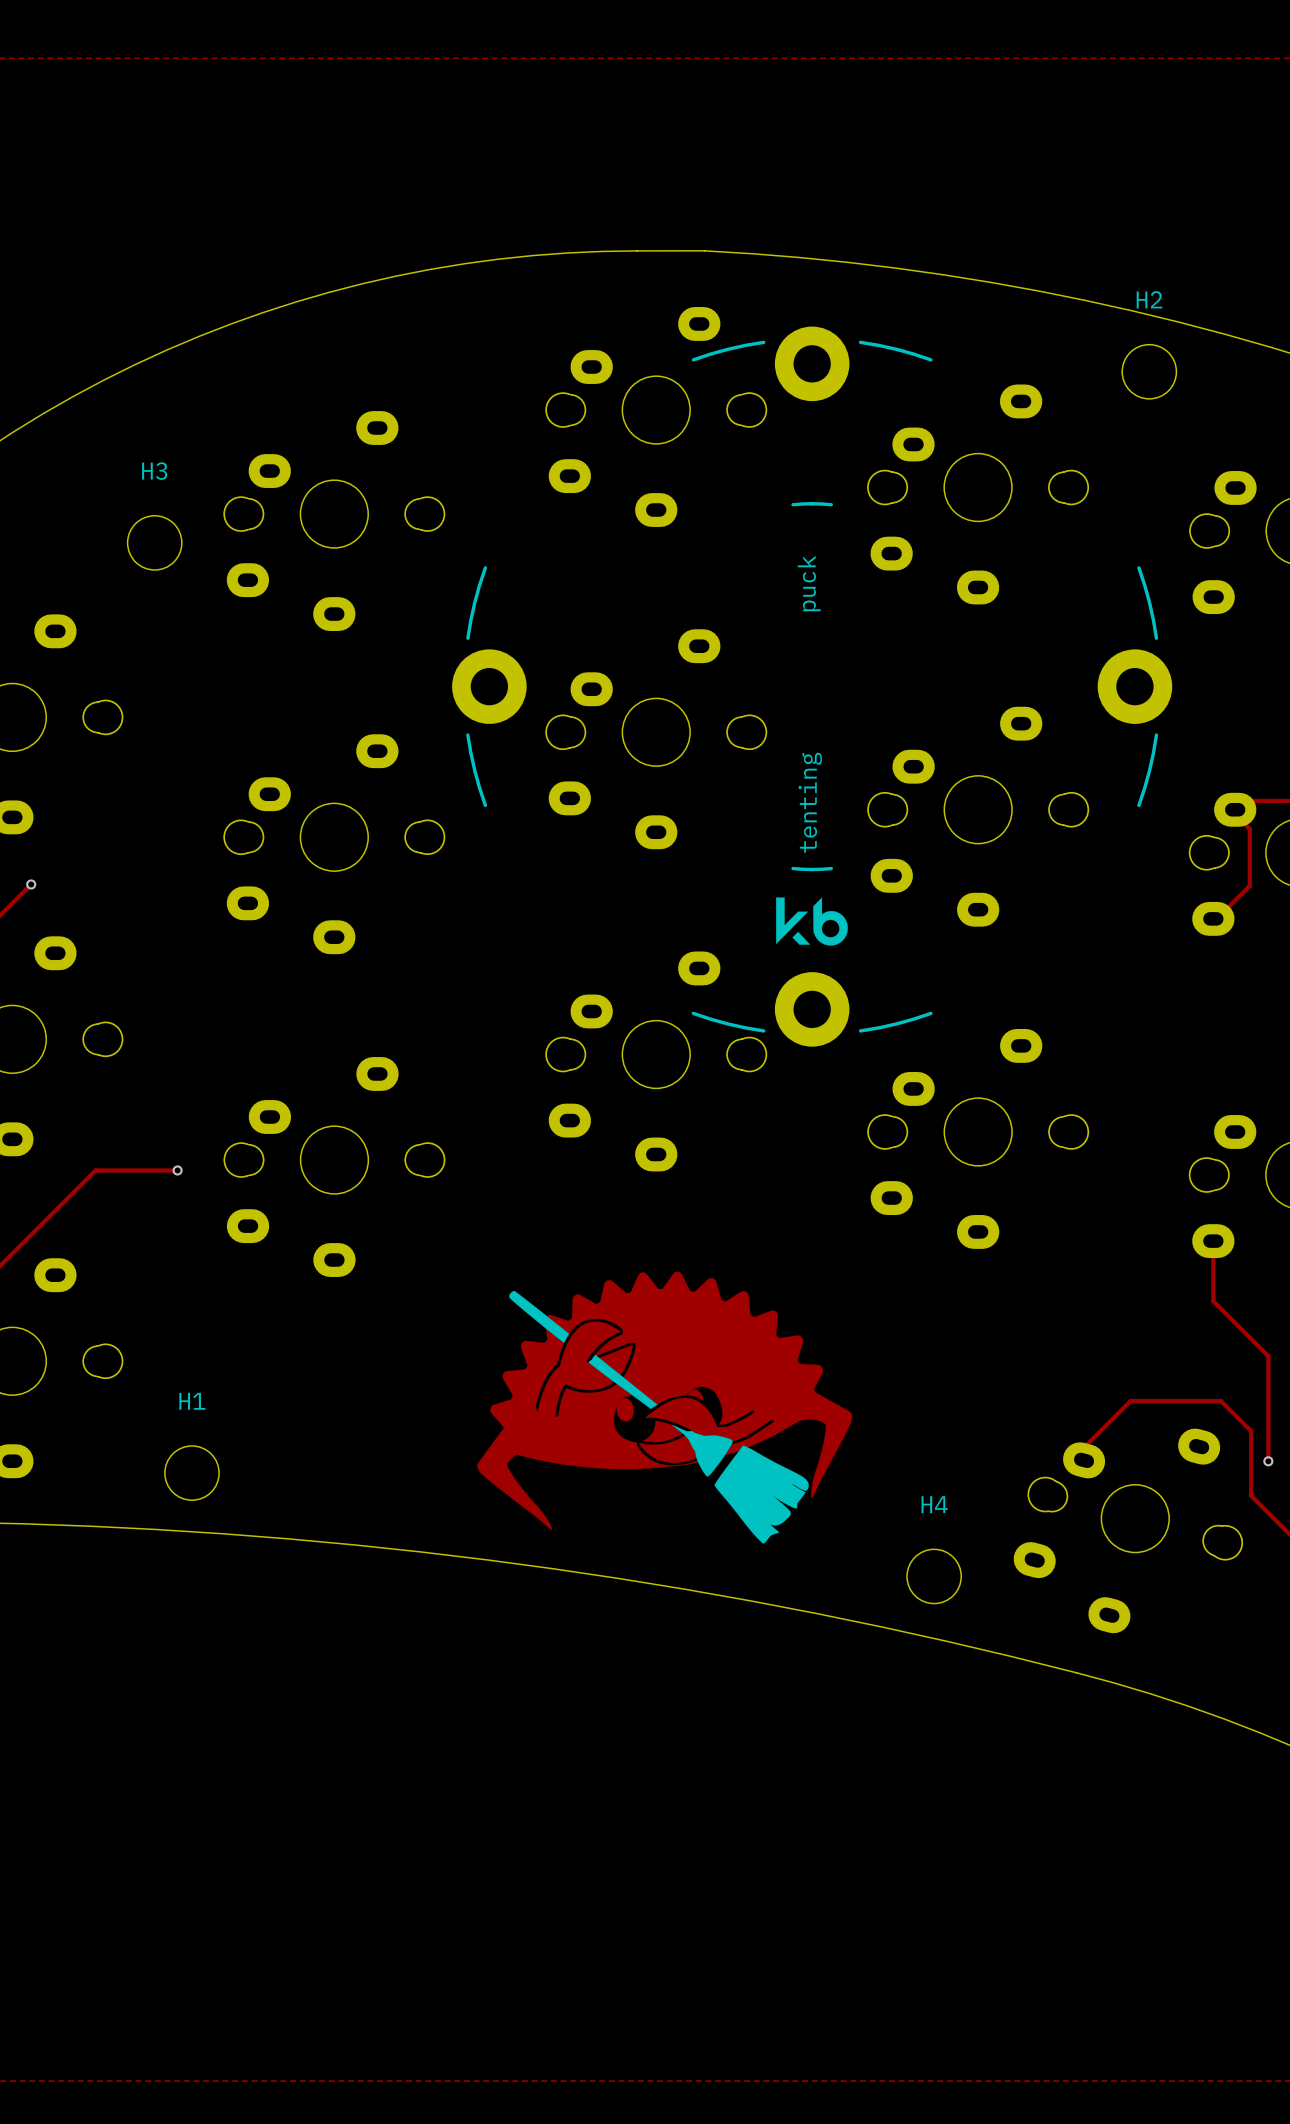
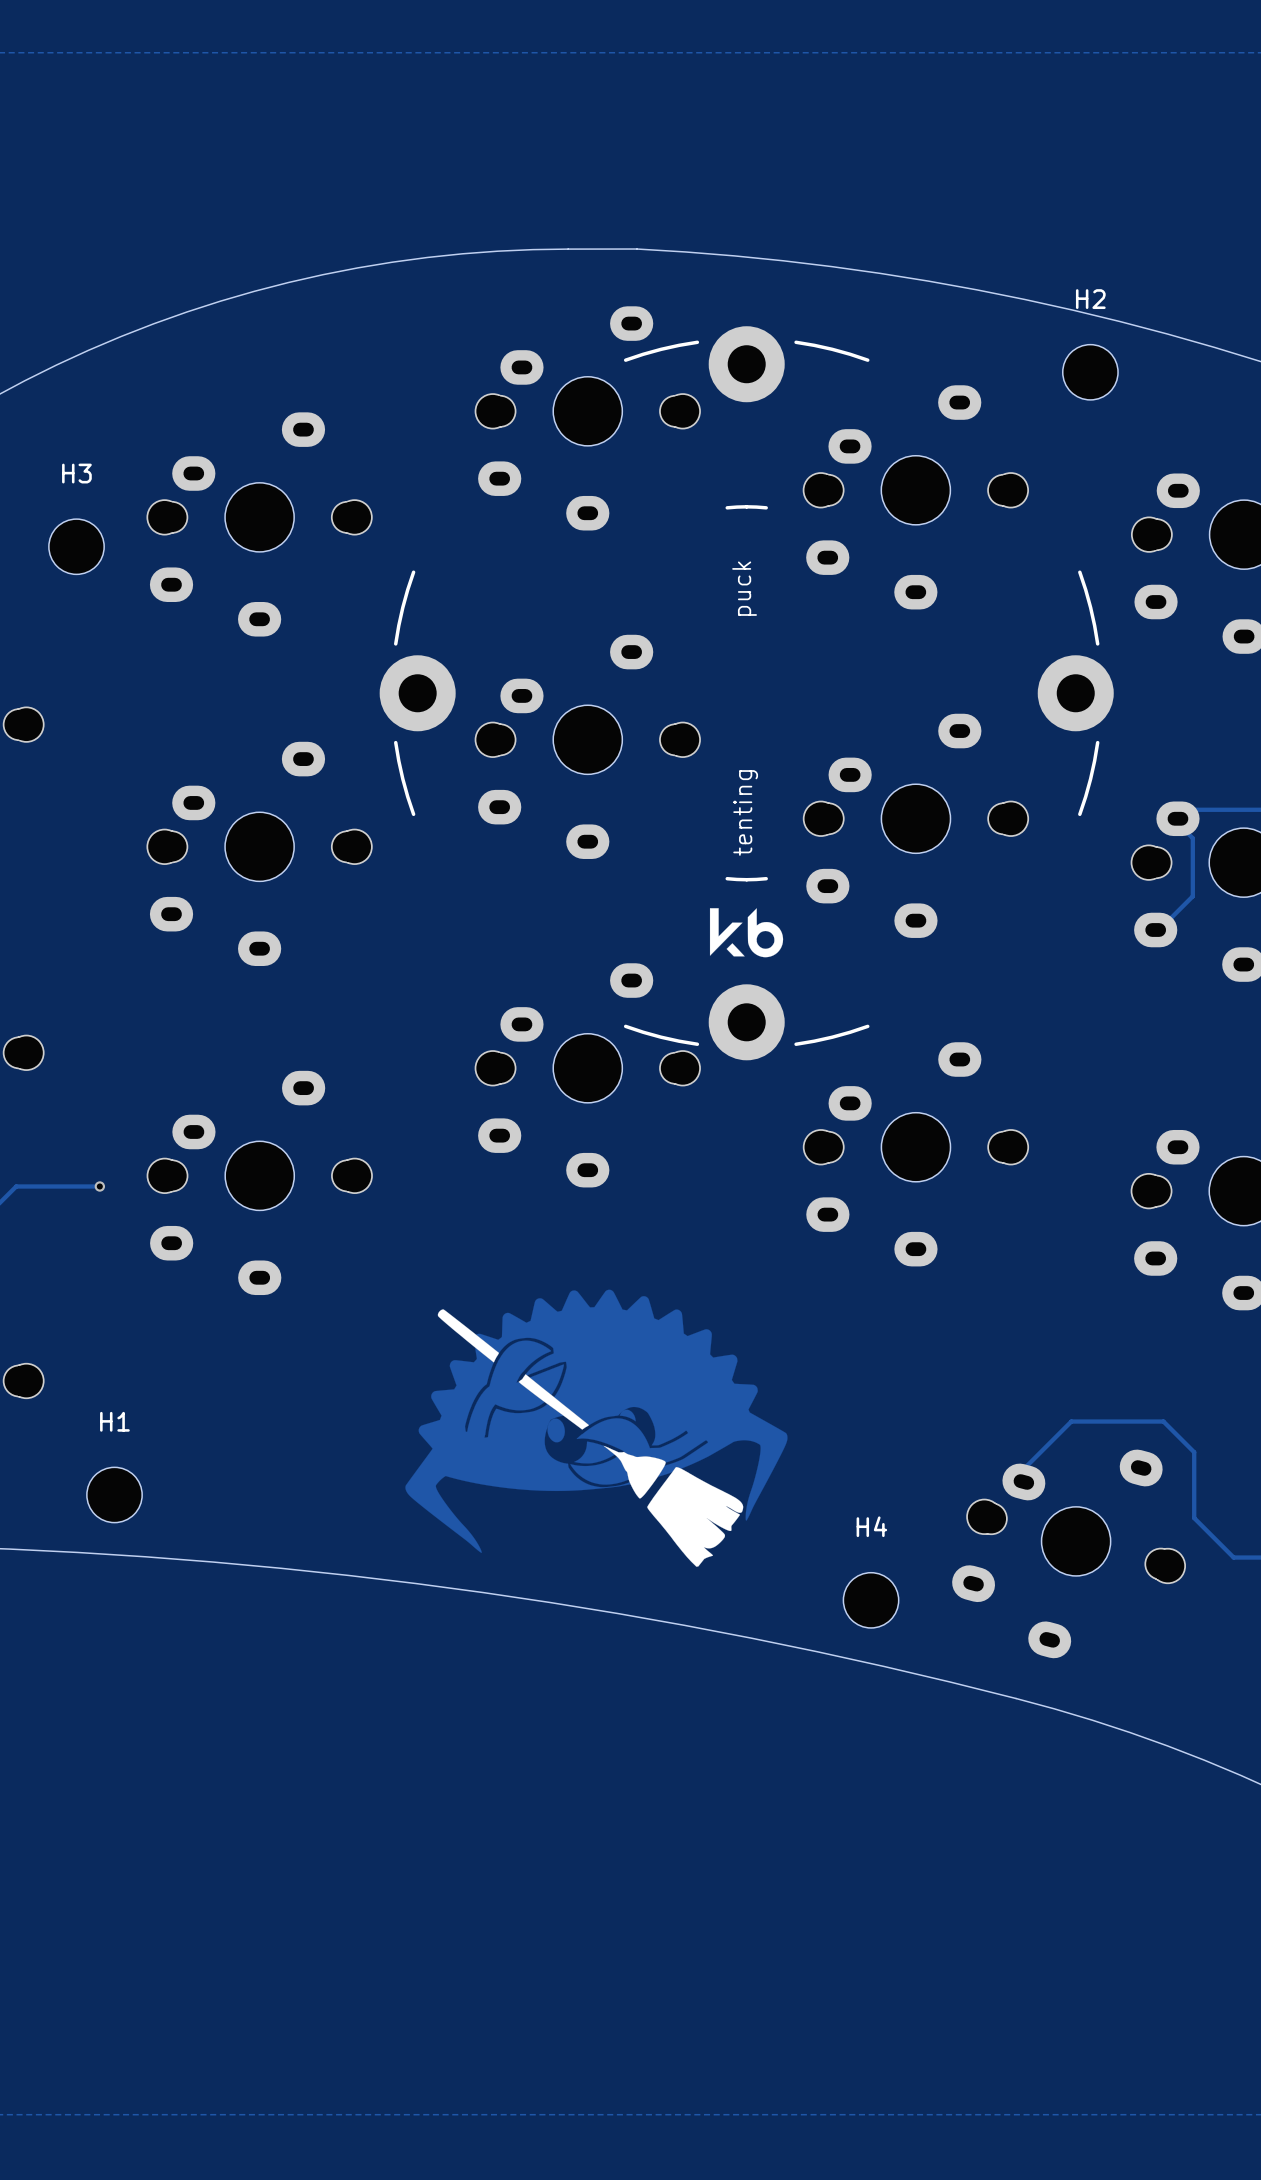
track: (1213, 1241) (1213, 1301) (1268, 1356) (1268, 1461) -> none
via: (1268, 1461) -> none

